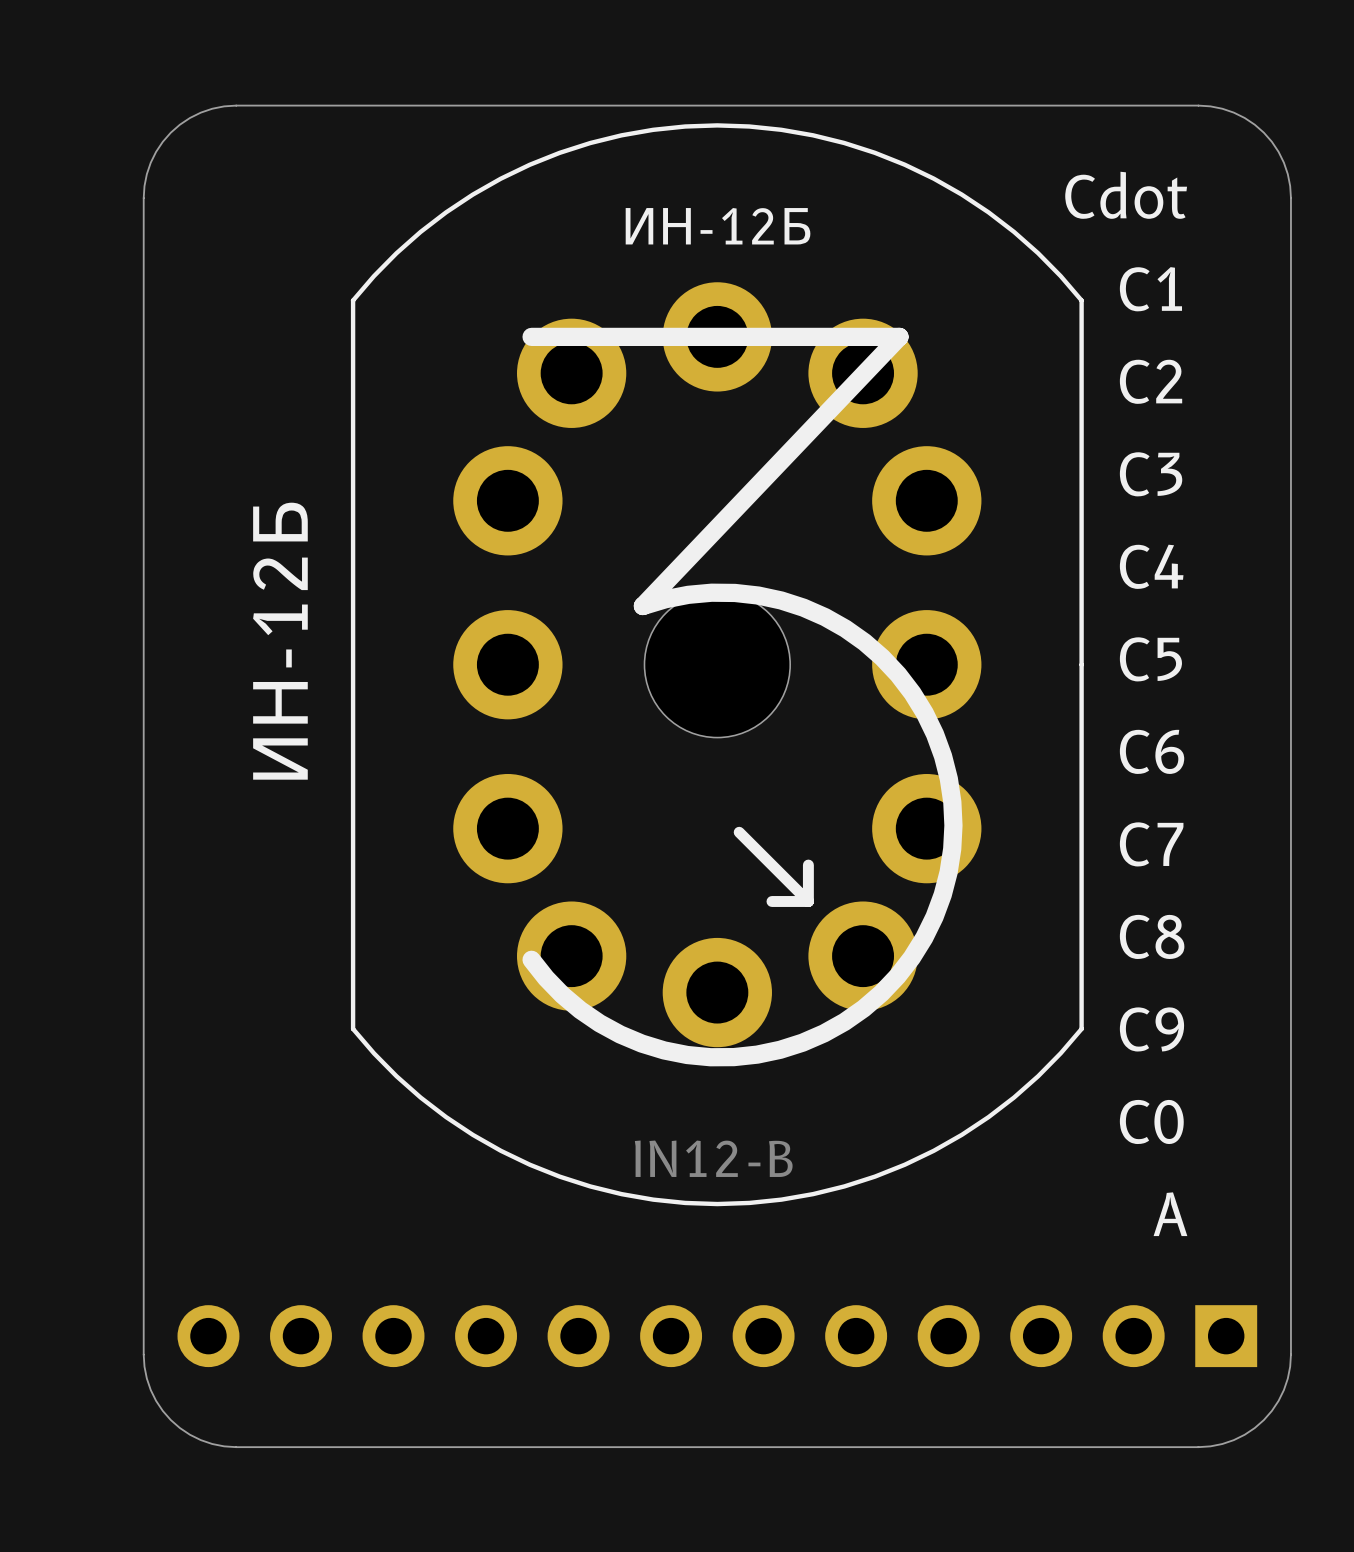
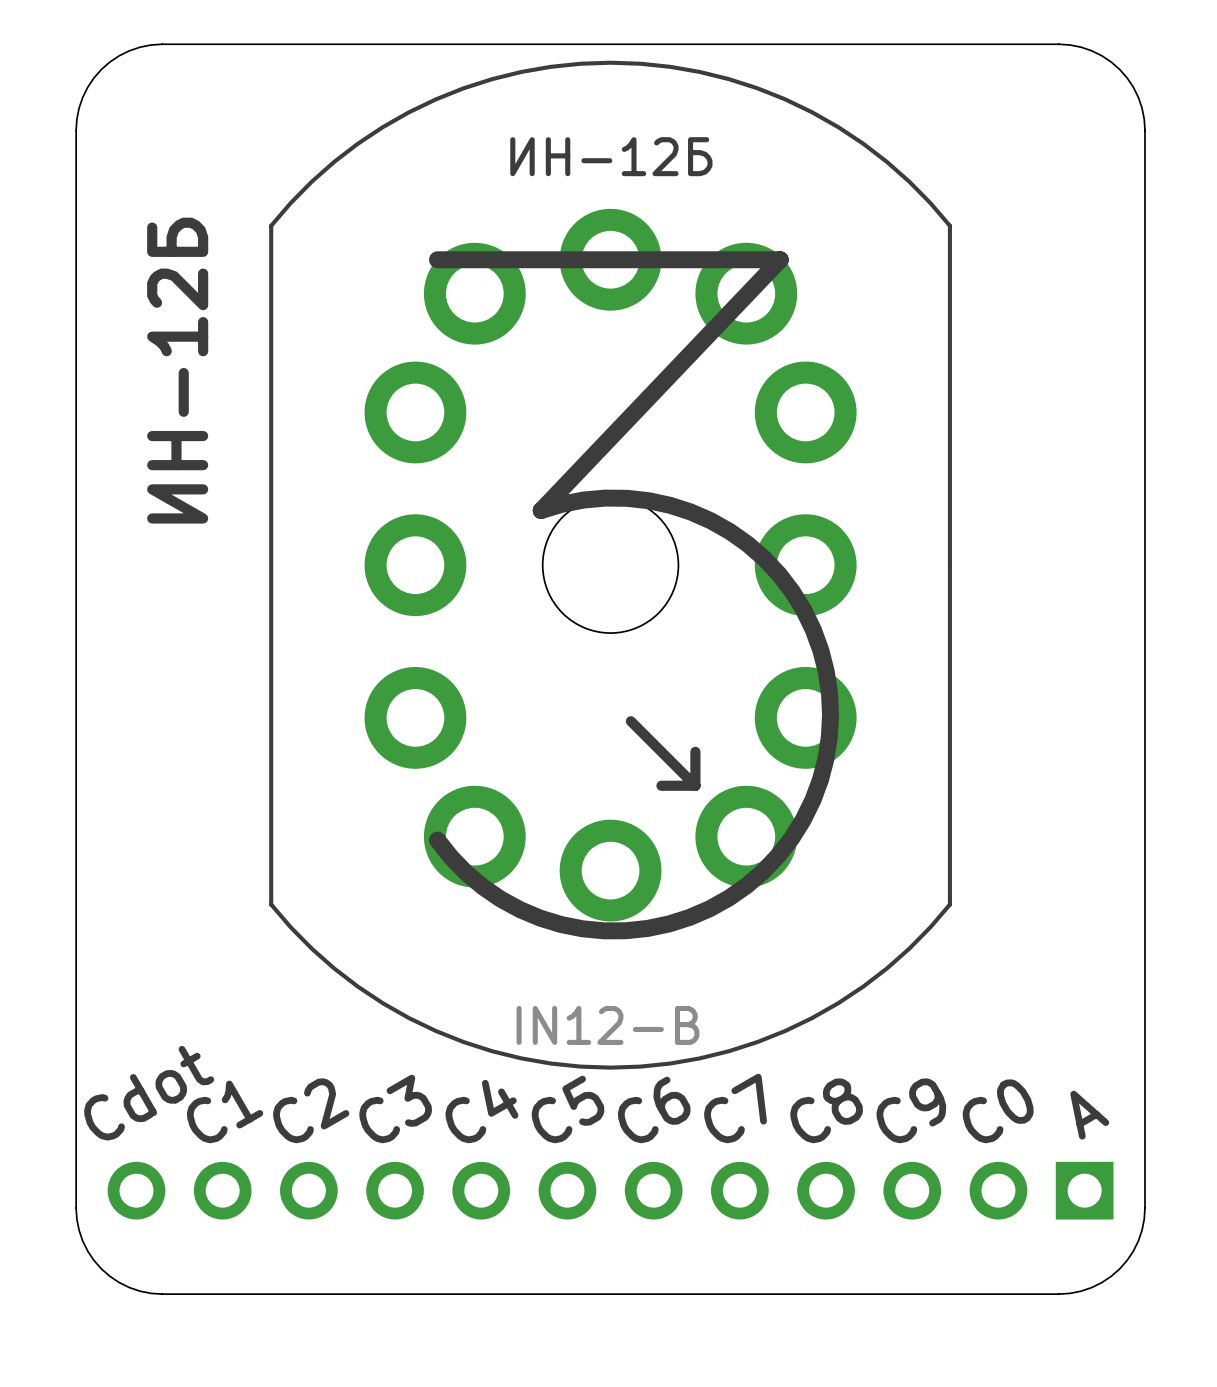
text: Cdot (1126, 195) -> none
text: C1 (1150, 289) -> none
text: C2 (1151, 381) -> none
text: C3 (1151, 474) -> none
text: C4 (1151, 566) -> none
text position: ИН-12Б (280, 641) -> ИН-12Б (177, 370)
text rotation: 0° (1150, 659) -> 30° counterclockwise (568, 1109)
text position: C5 (1150, 659) -> C5 (568, 1109)
text rotation: 0° (1152, 751) -> 30° counterclockwise (654, 1109)
text position: C6 (1152, 751) -> C6 (654, 1109)
text rotation: 0° (1151, 844) -> 30° counterclockwise (735, 1108)
text position: C7 (1151, 844) -> C7 (735, 1108)
text rotation: 0° (1152, 936) -> 30° counterclockwise (826, 1110)
text position: C8 (1152, 936) -> C8 (826, 1110)
text rotation: 0° (1151, 1029) -> 30° counterclockwise (911, 1110)
text position: C9 (1151, 1029) -> C9 (911, 1110)
text rotation: 0° (1151, 1121) -> 30° counterclockwise (998, 1111)
text position: C0 (1151, 1121) -> C0 (998, 1111)
text rotation: 0° (1170, 1214) -> 30° counterclockwise (1089, 1115)
text: none -> Cdot (149, 1093)
text: none -> C3 (395, 1109)
text: none -> C1 (225, 1111)
text: none -> C2 (311, 1110)
text: none -> C4 (481, 1111)

